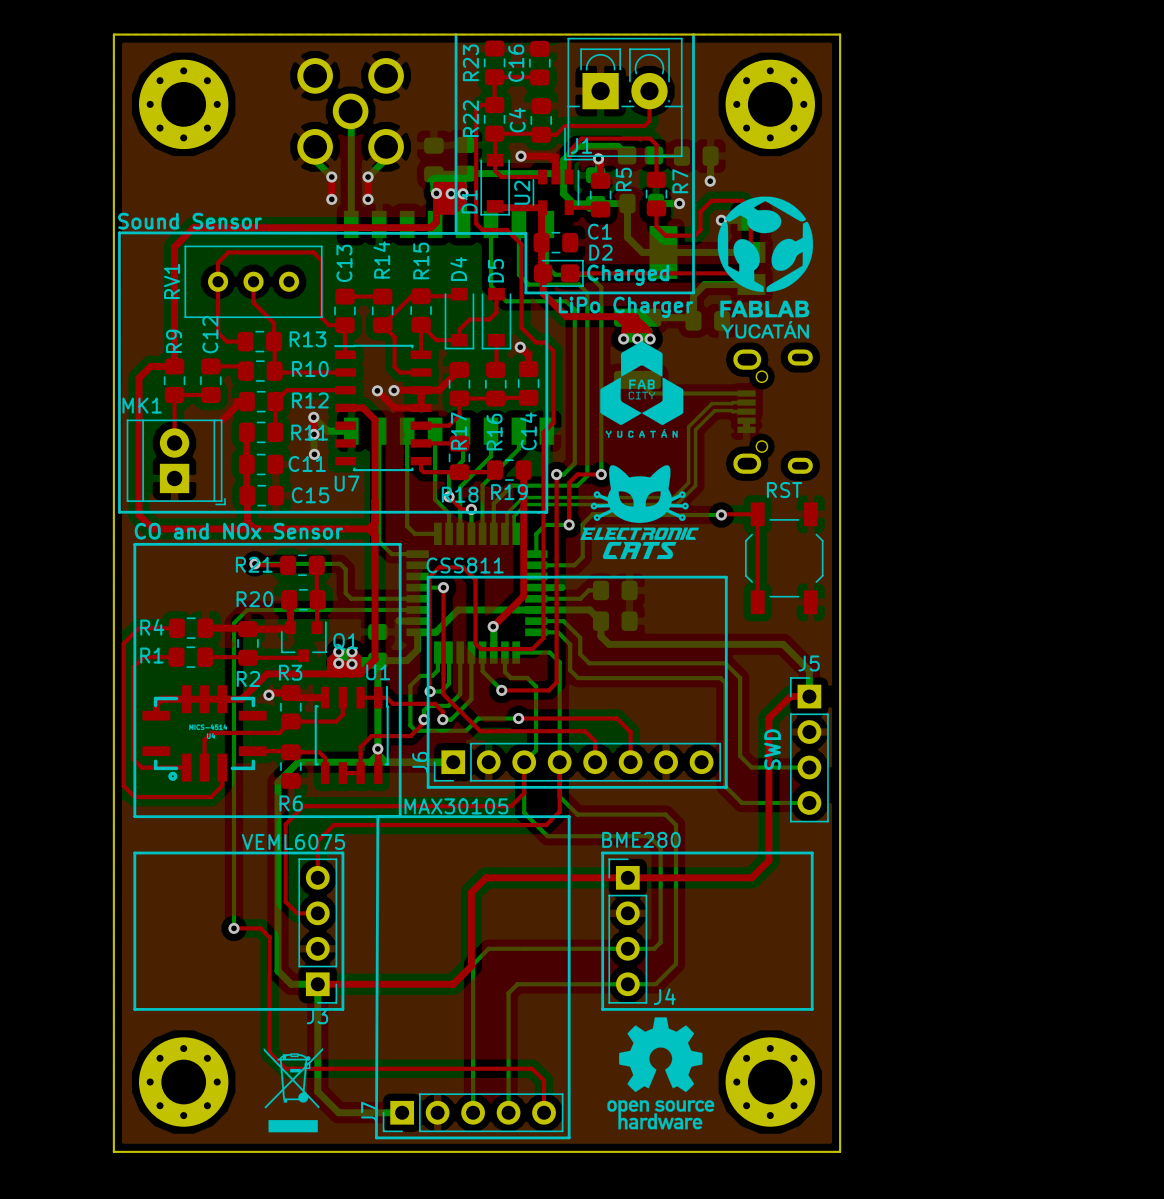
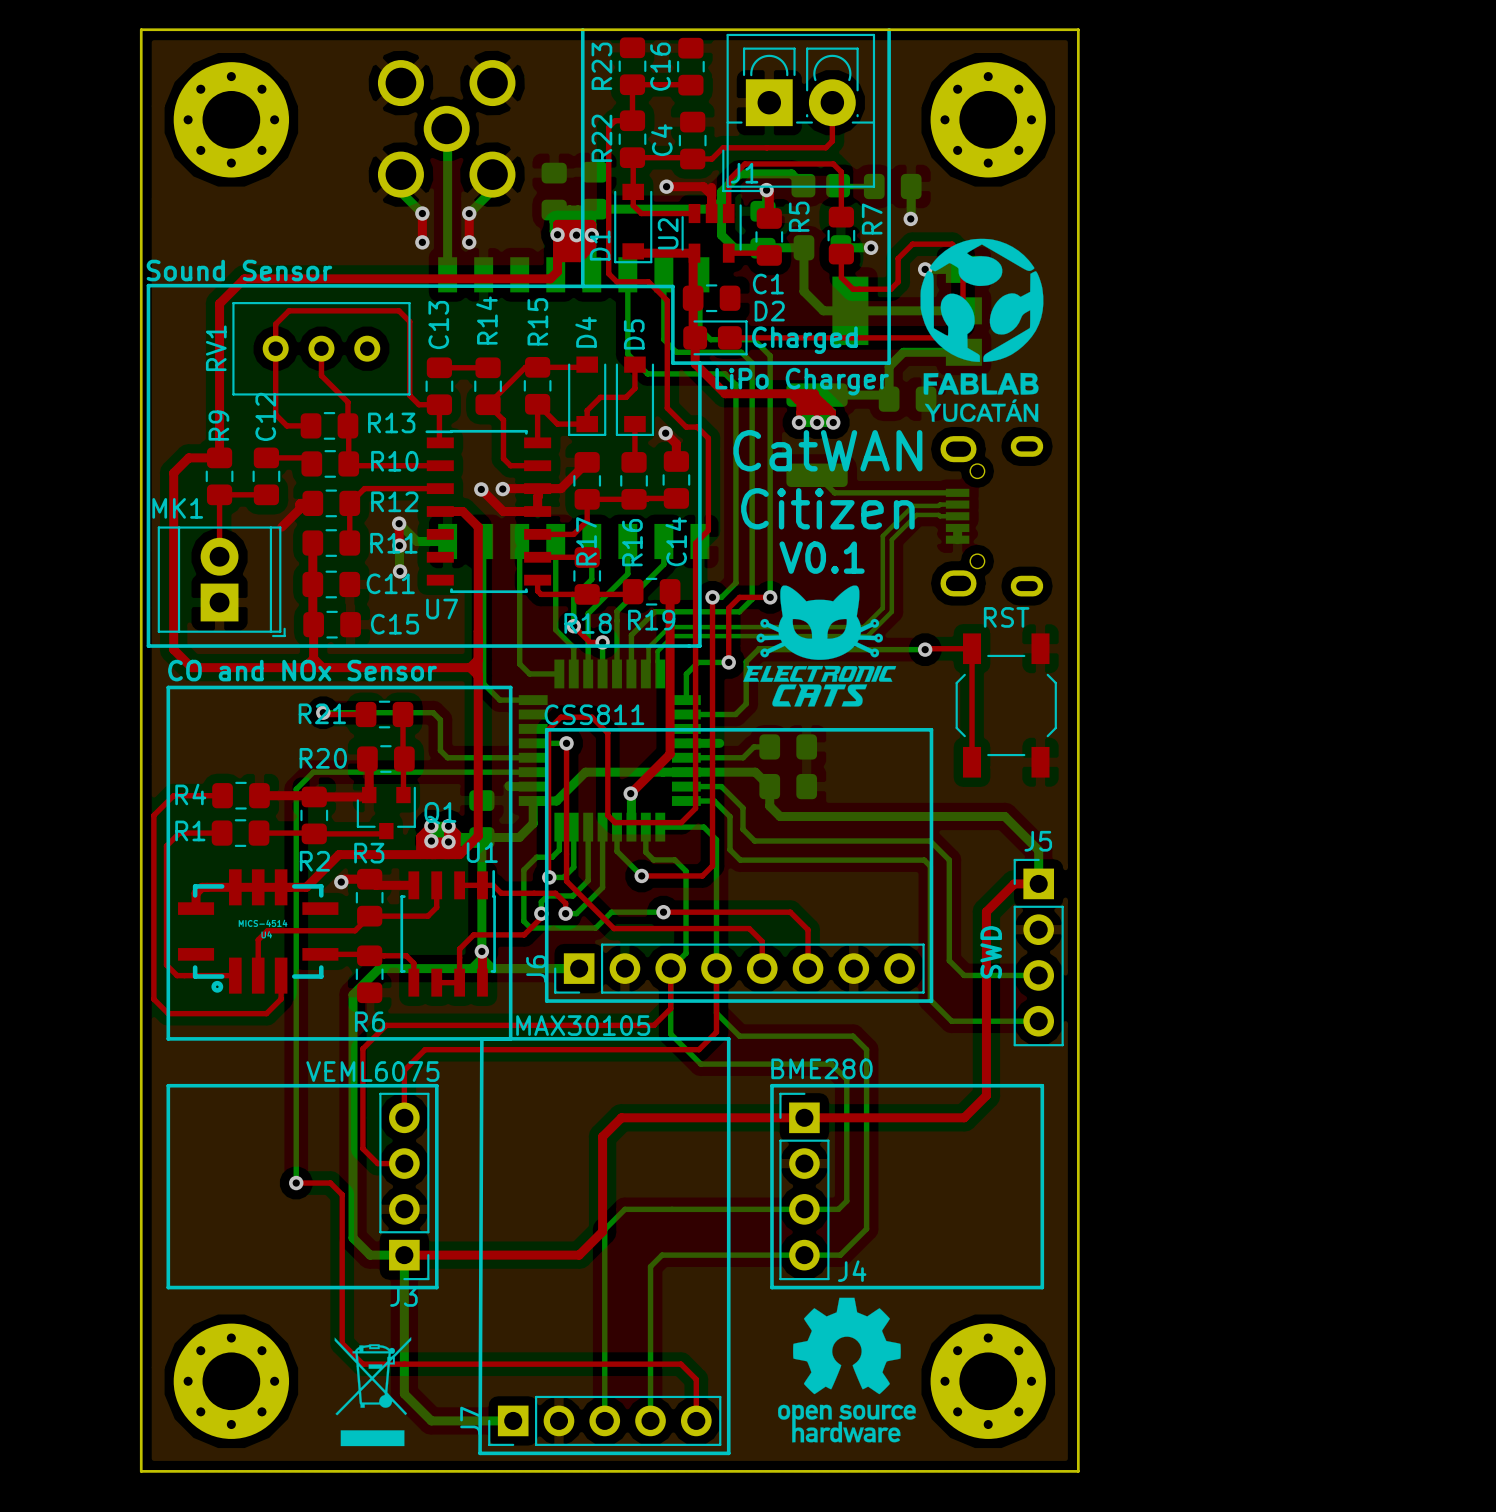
drawing: [600, 341, 684, 438] -> none
text: none -> CatWAN (827, 450)
text: none -> Citizen (827, 508)
text: none -> V0.1 (822, 557)

